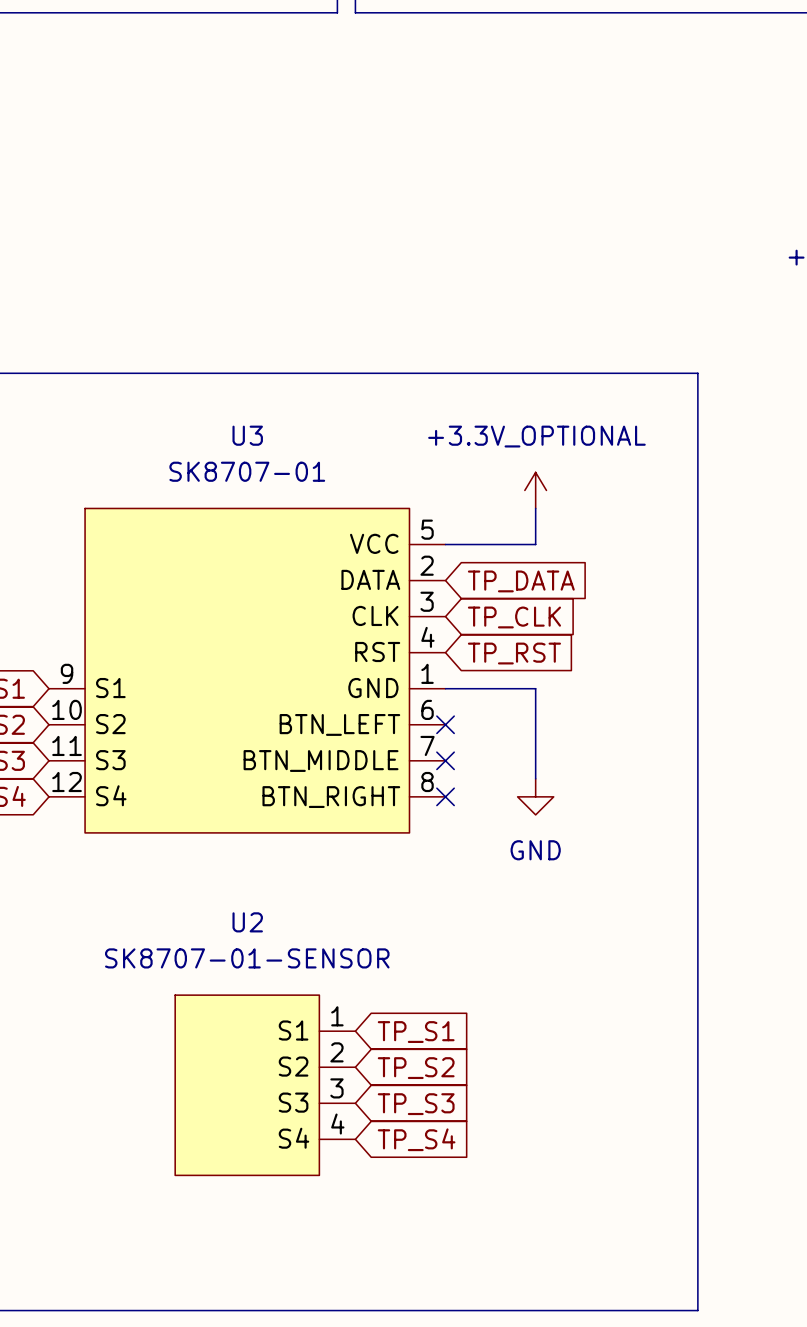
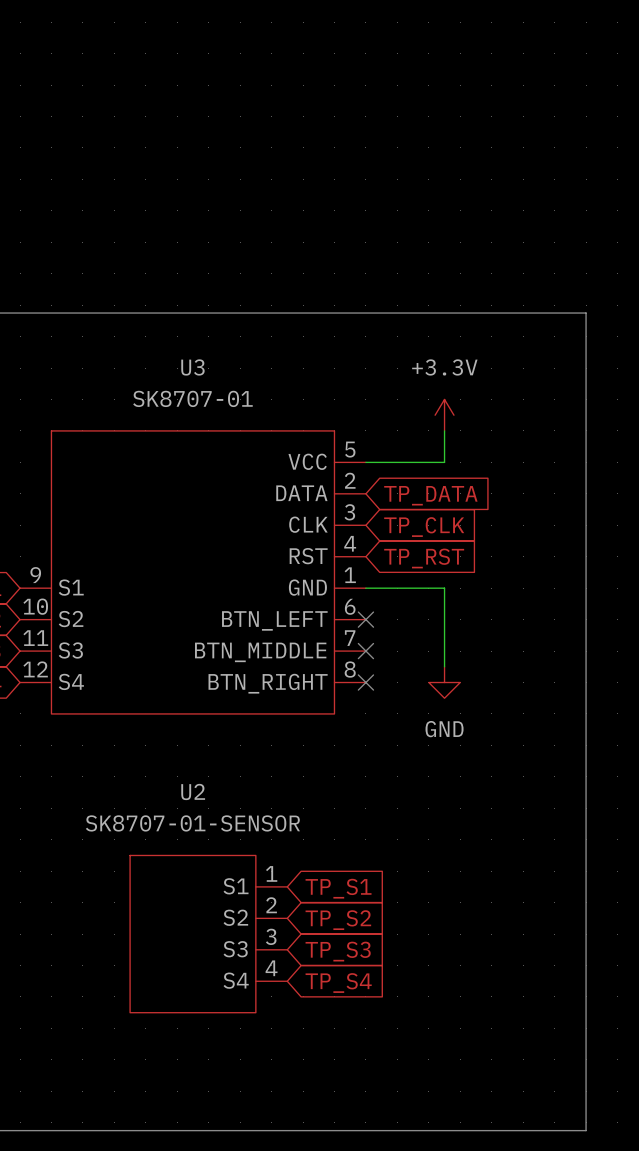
power symbol: +3.3V_OPTIONAL (535, 490) -> +3.3V (444, 415)

